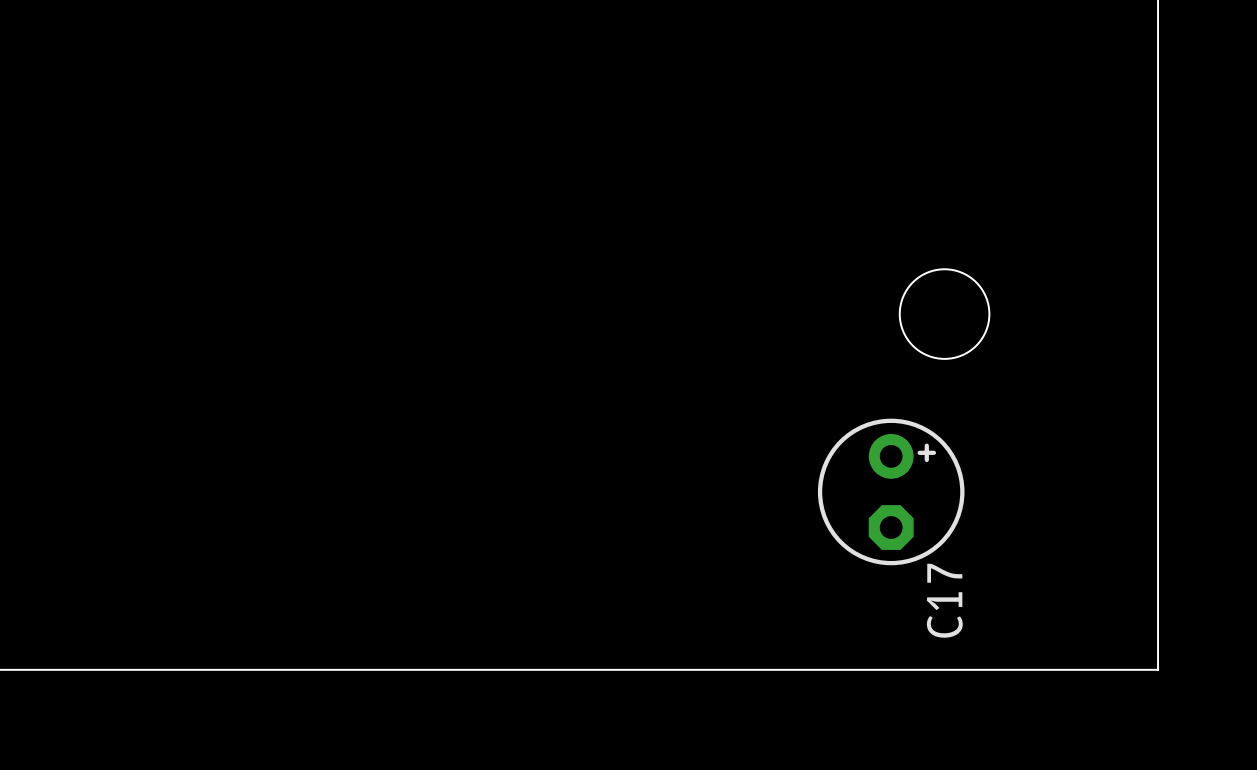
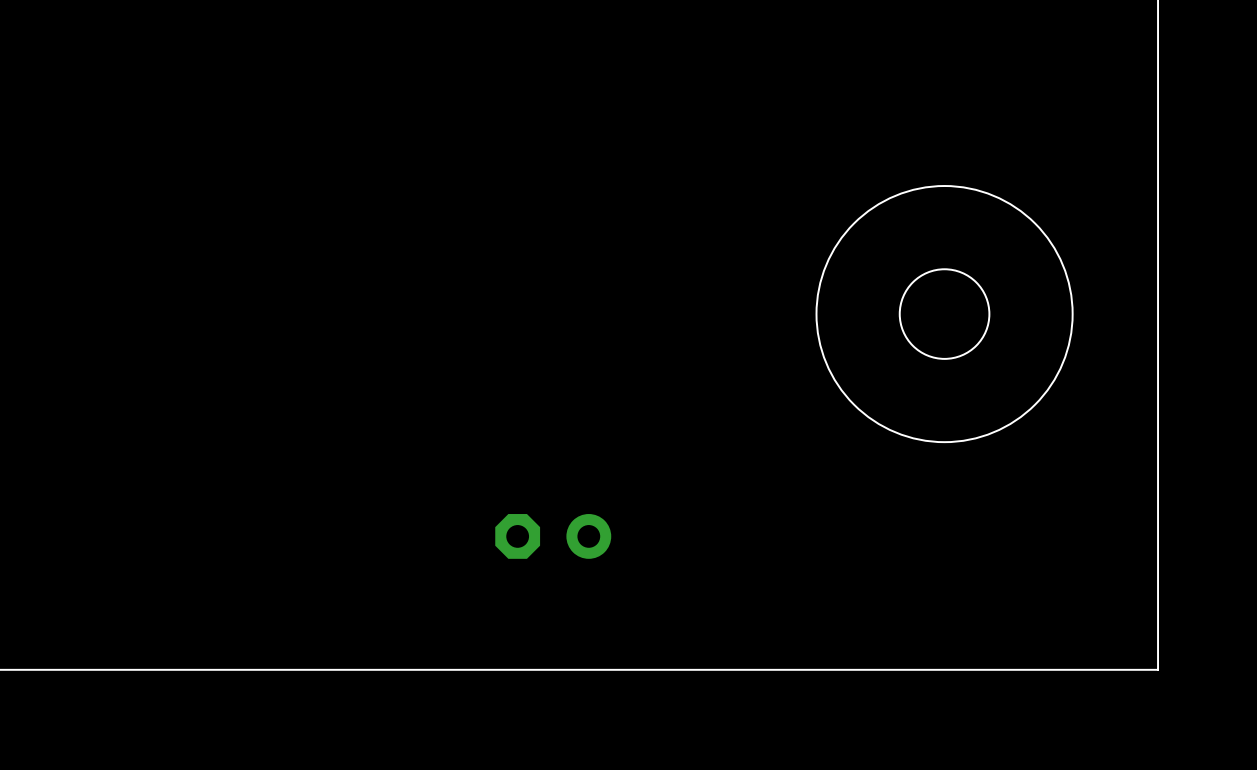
round board edge: none -> [816, 185, 1074, 443]
C17 side: bottom (891, 491) -> top (553, 536)

